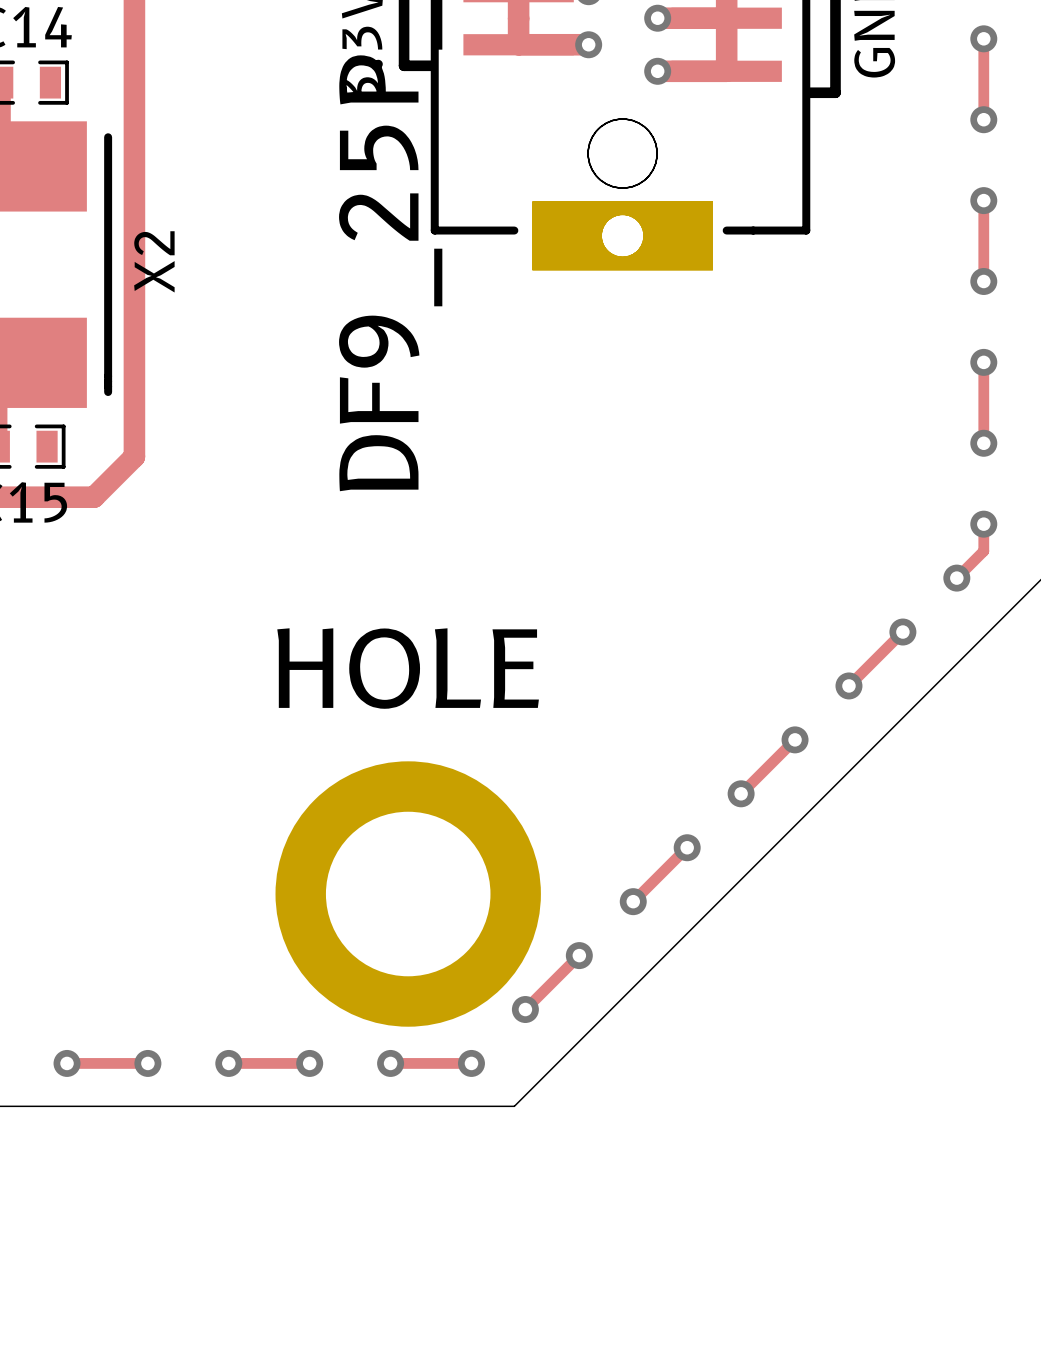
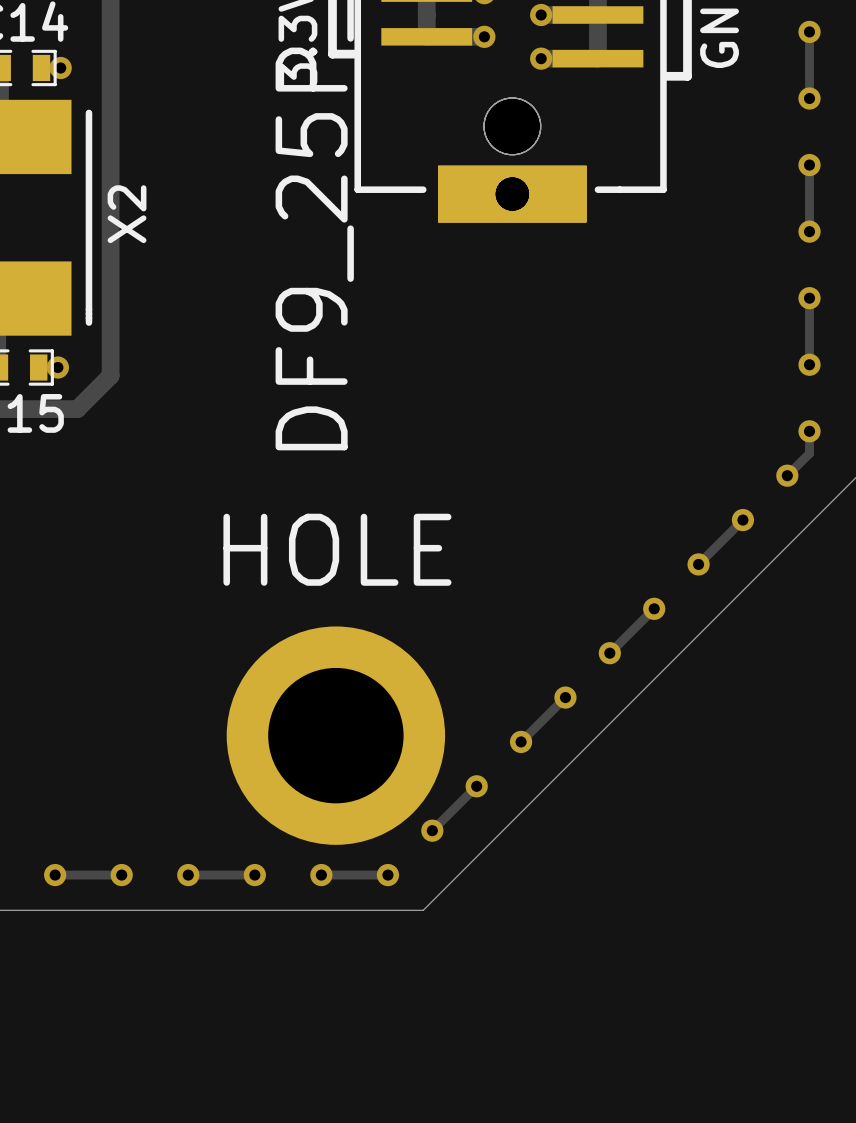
via: none -> (60, 67)
via: none -> (57, 367)

